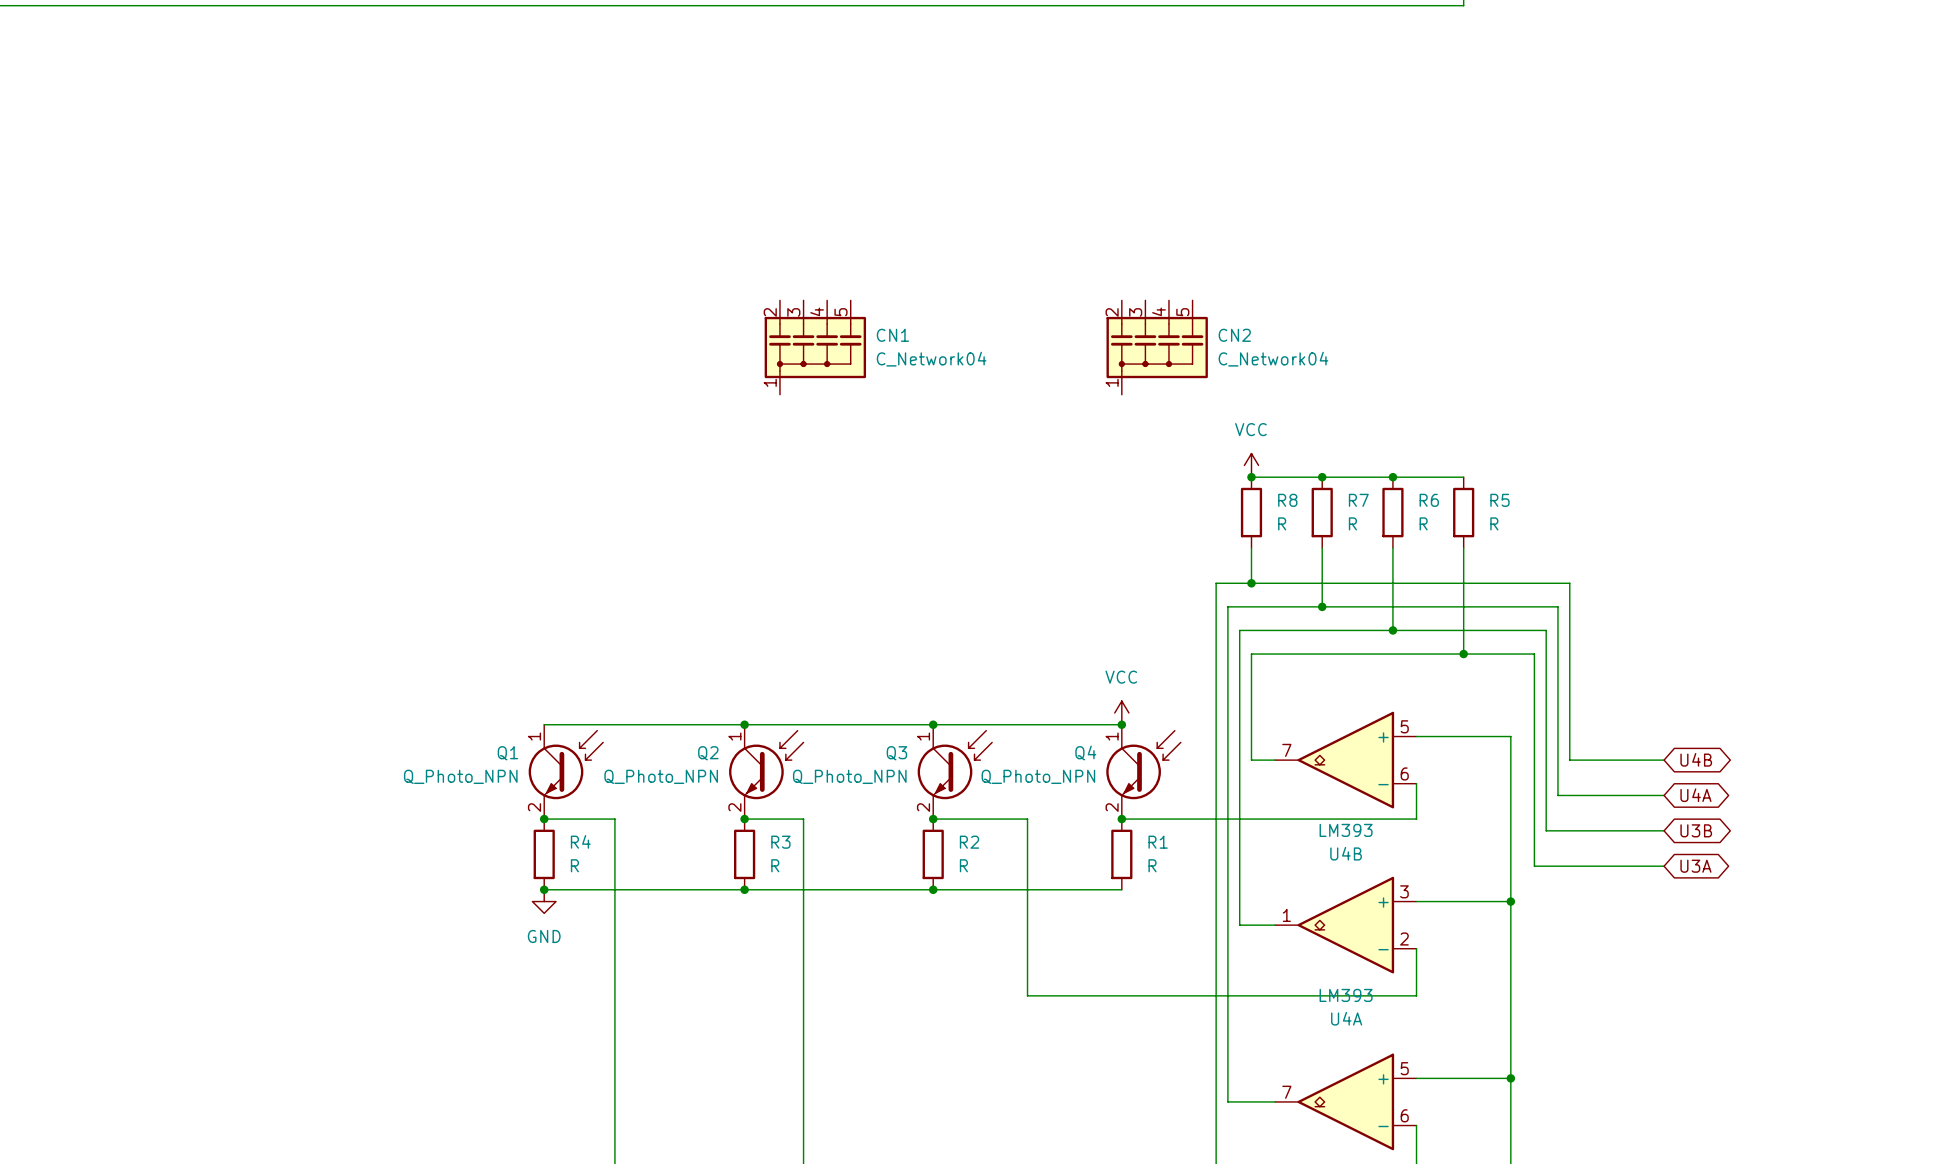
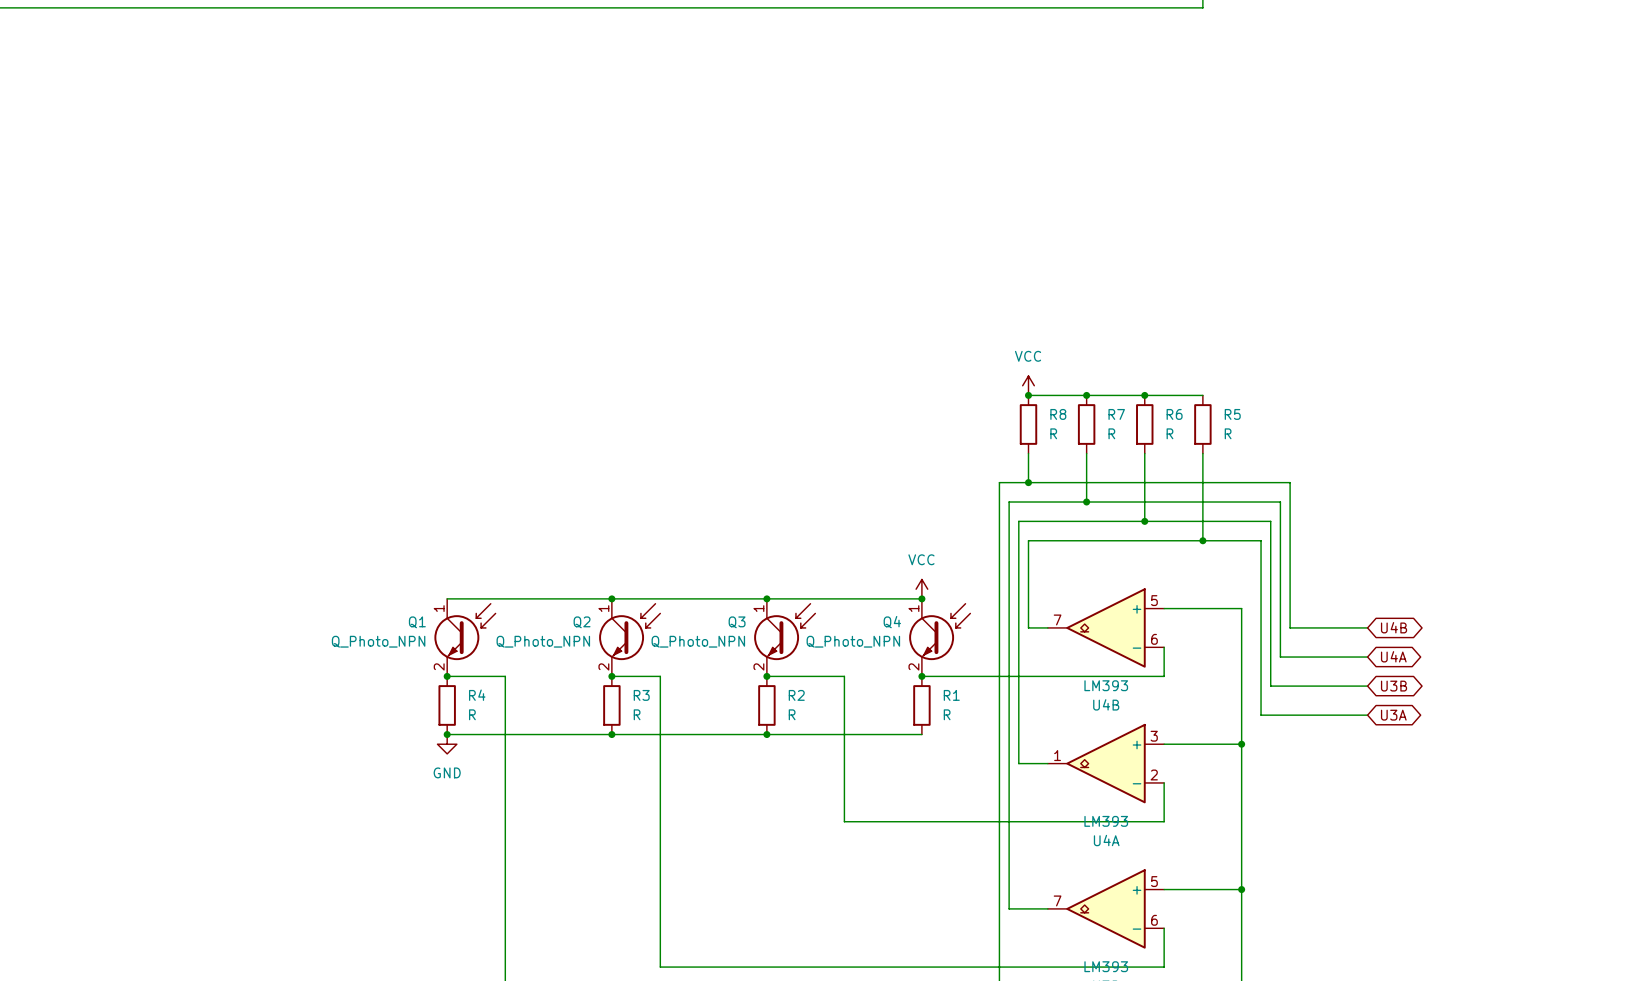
CN1: C_Network04 (815, 347) -> none
CN2: C_Network04 (1157, 347) -> none

